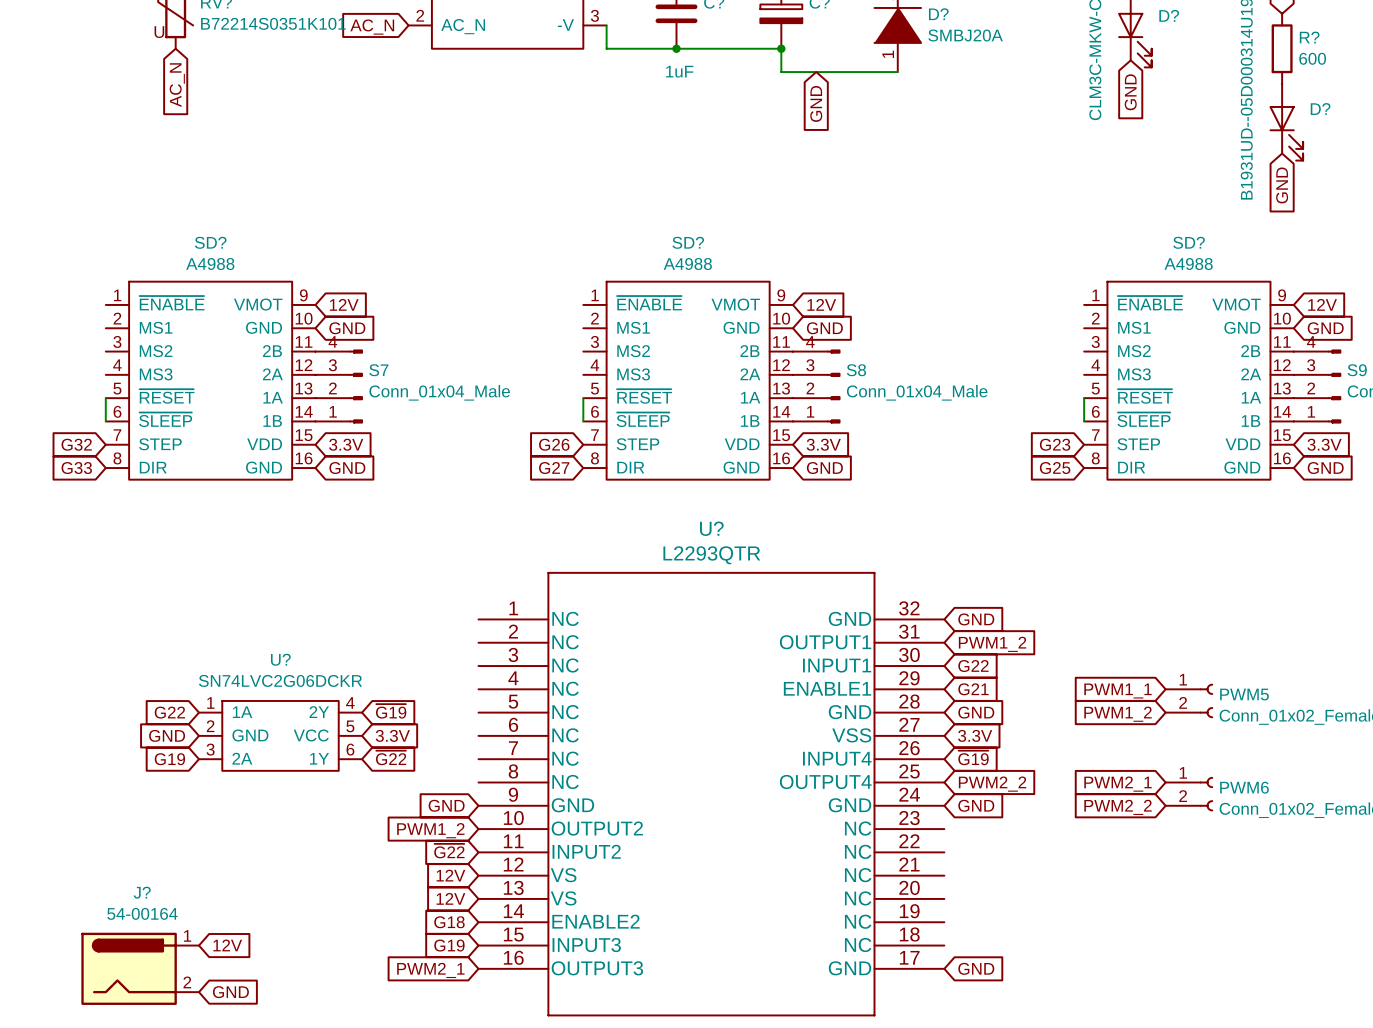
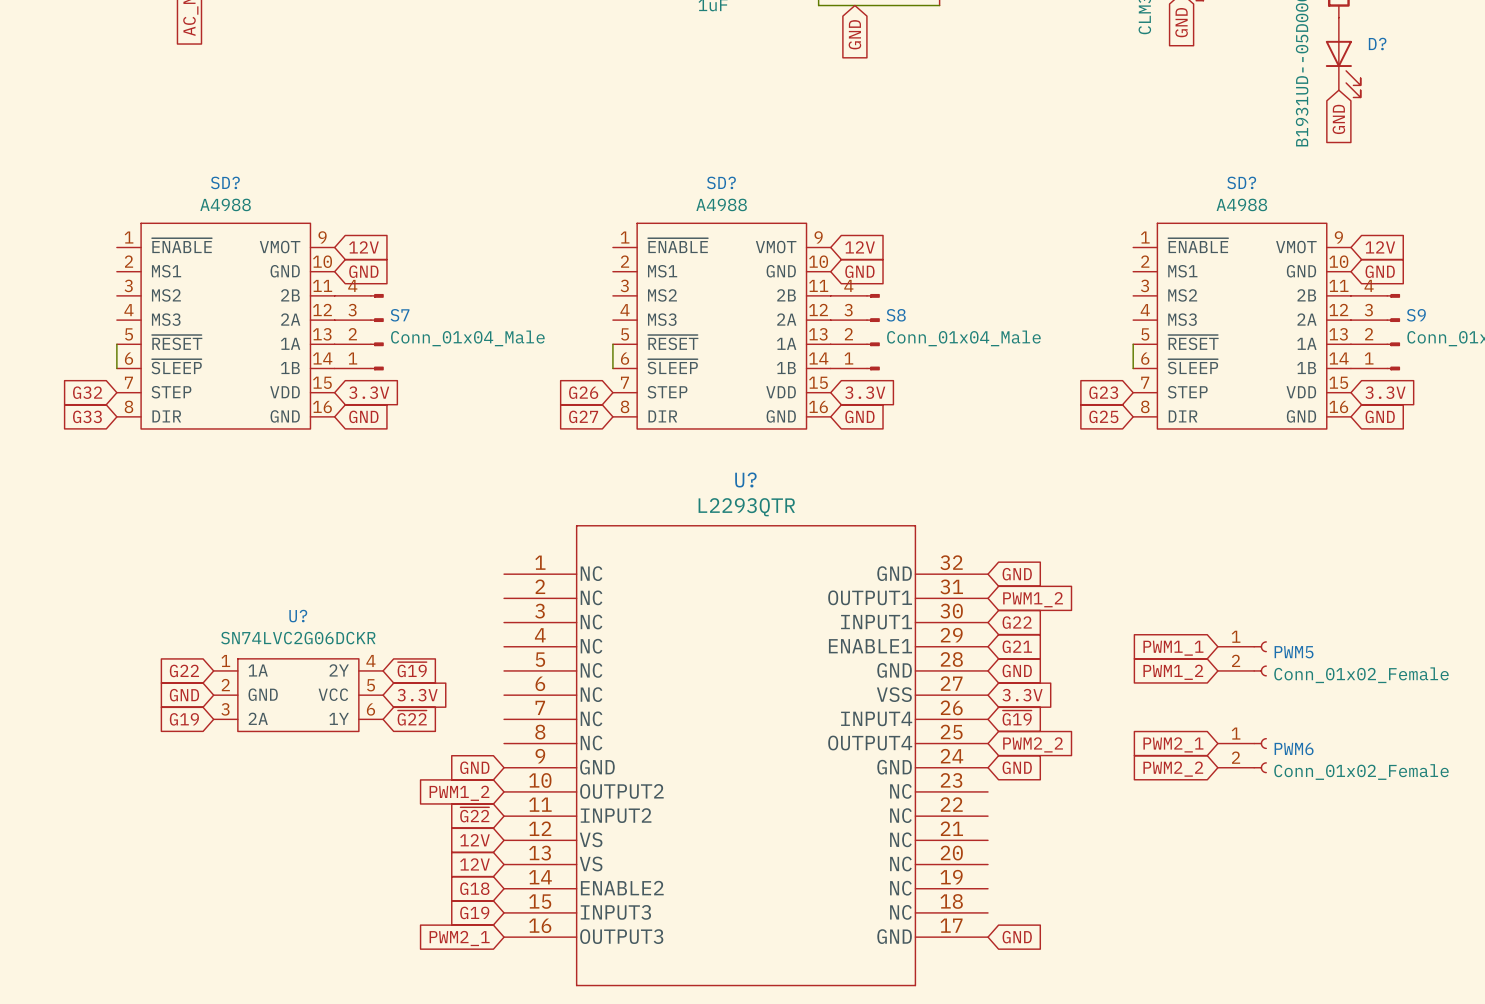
global label: 12V (227, 945) -> none
J?: 54-00164 (140, 968) -> none
global label: GND (230, 992) -> none

